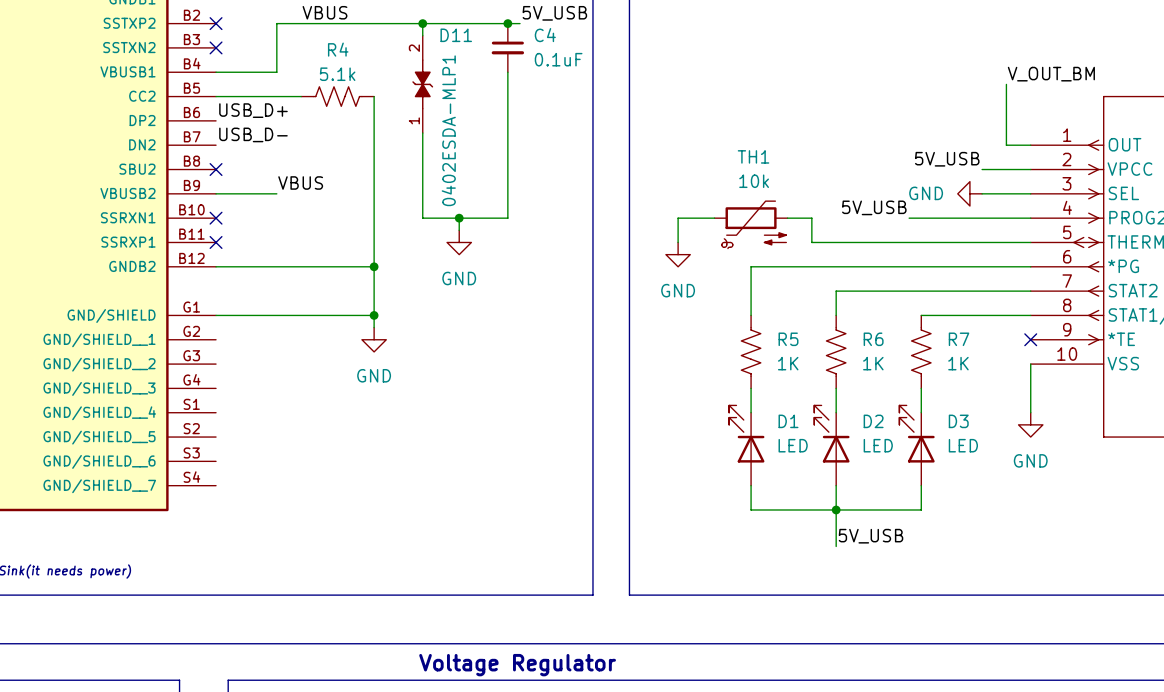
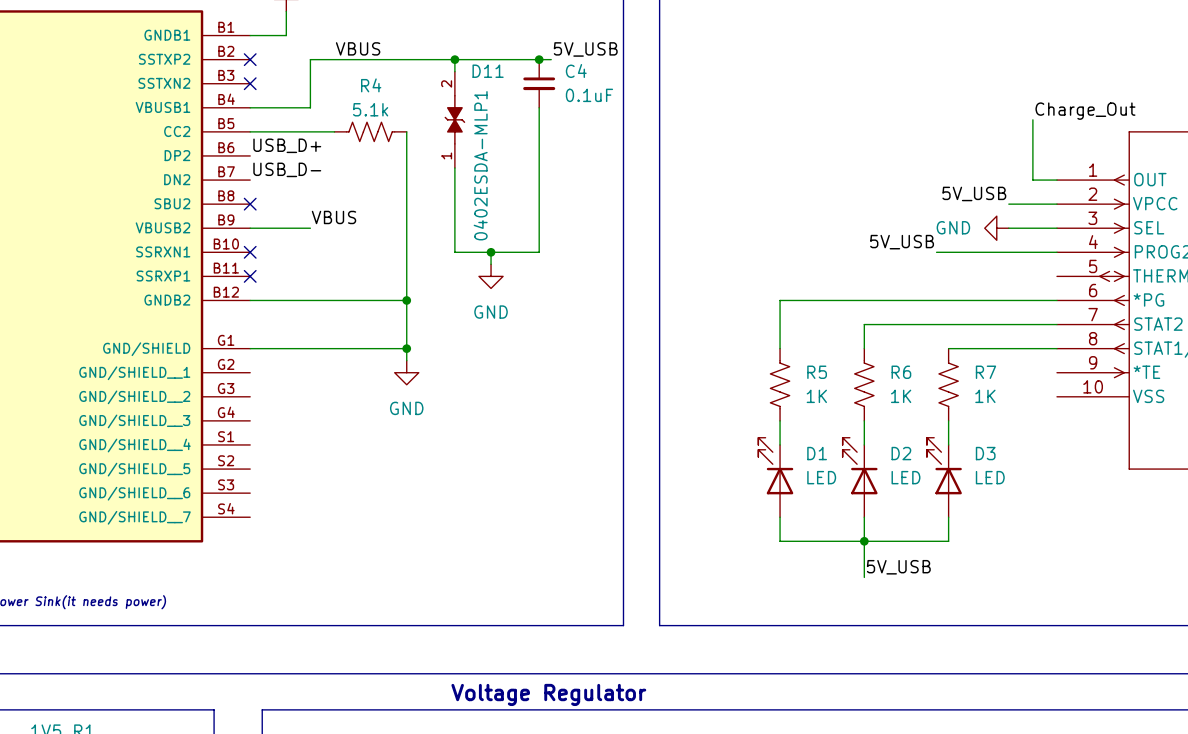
label: V_OUT_BM (1051, 74) -> Charge_Out (1085, 111)
wire: (714, 218) (678, 218) (678, 242) -> none
wire: (787, 218) (811, 218) (811, 242) (1030, 242) -> none
TH1: 10k (751, 224) -> none
power symbol: GND (678, 254) -> none
no-connect mark: (1030, 339) -> none
wire: (1030, 364) (1030, 412) -> none
power symbol: GND (1030, 424) -> none

